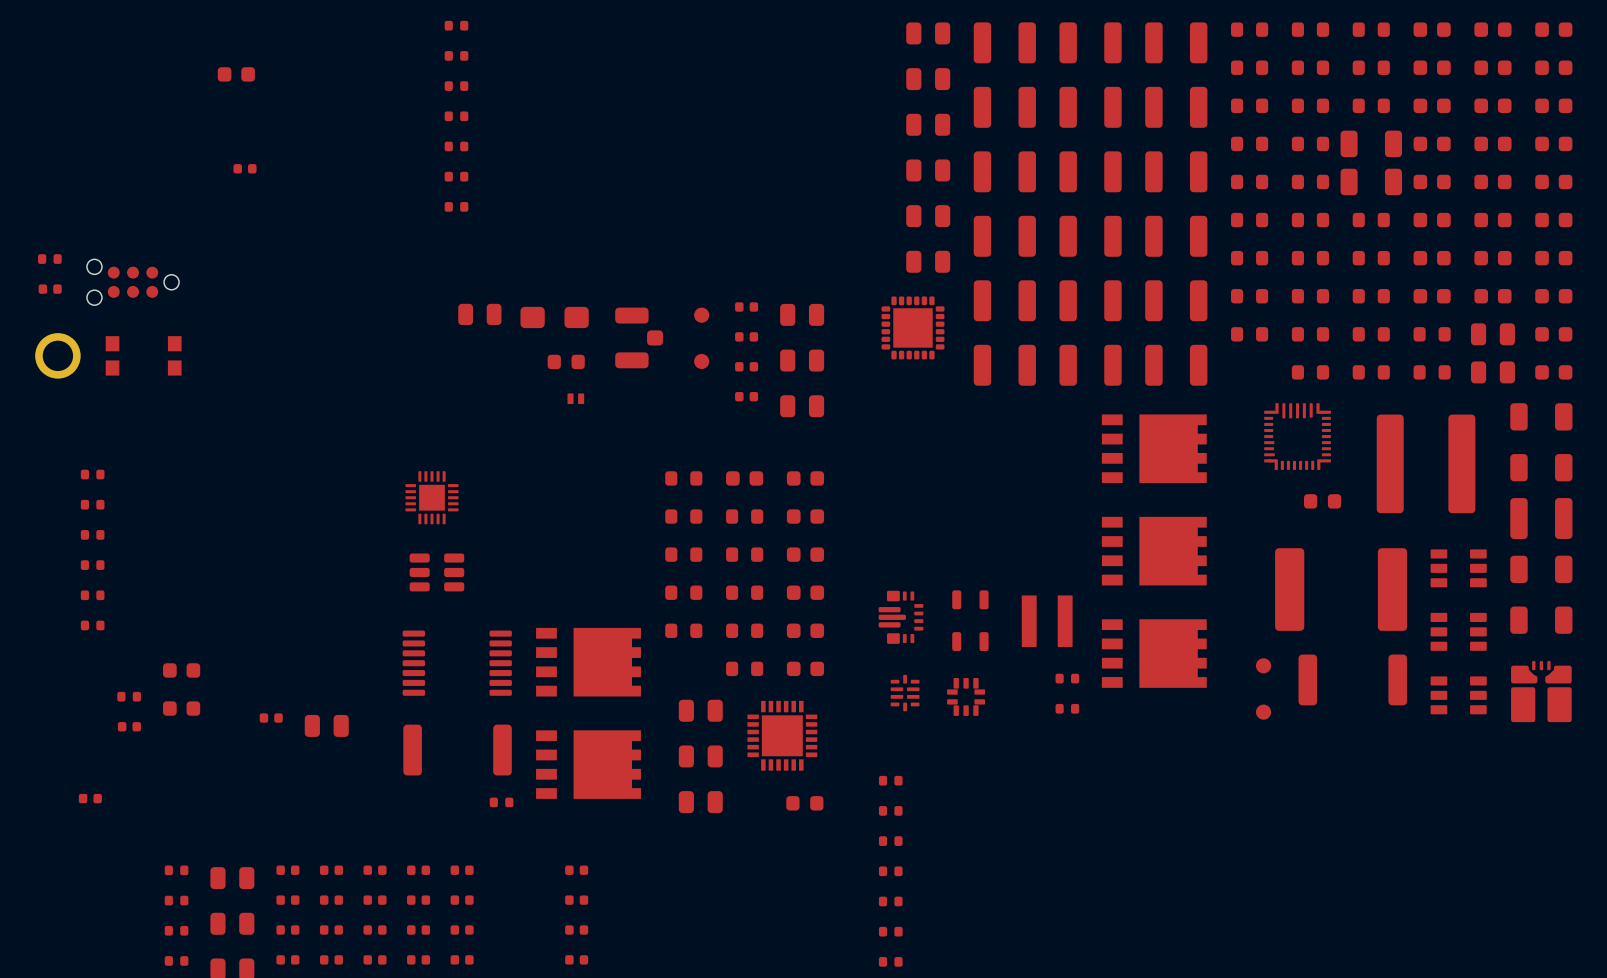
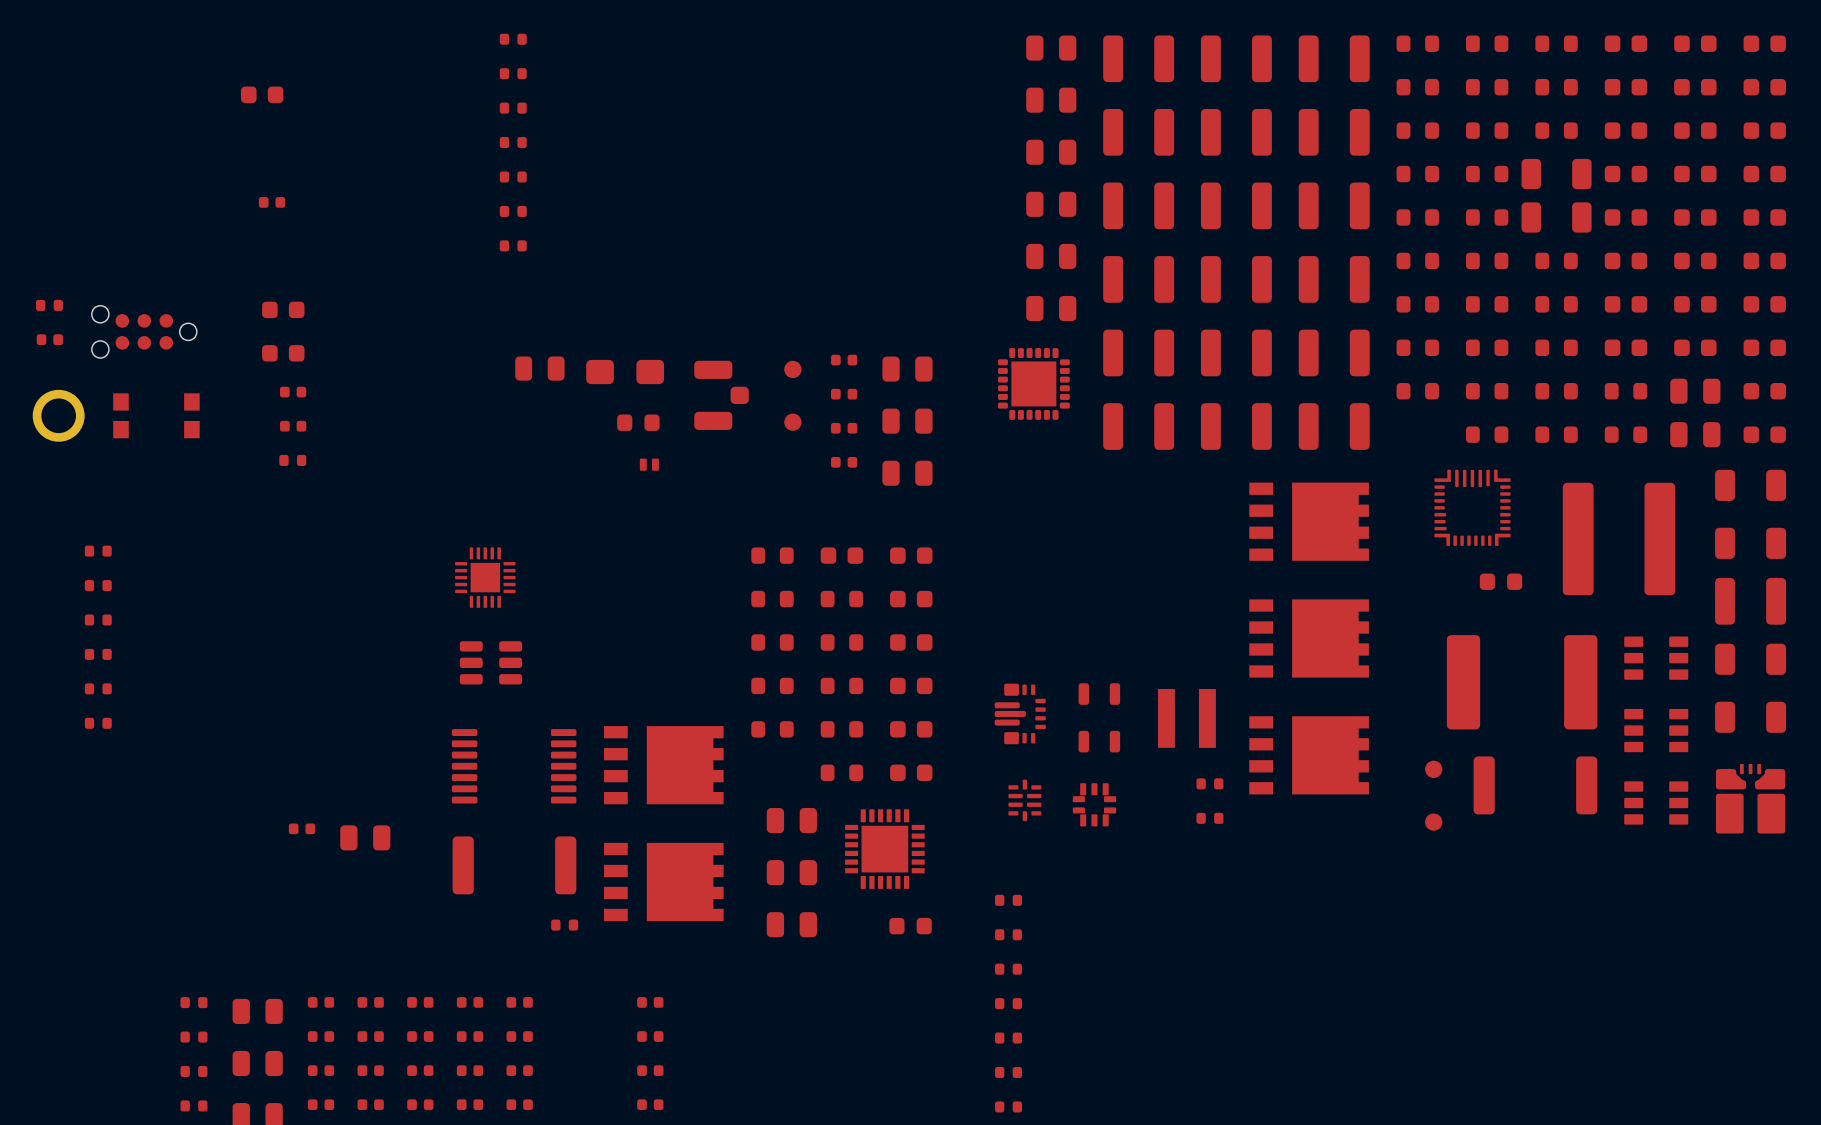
part: none -> (283, 309)
part: none -> (283, 353)
part: none -> (293, 392)
part: none -> (293, 426)
part: (181, 670) -> none
part position: (129, 696) -> (292, 460)
part: (181, 708) -> none
part: (129, 726) -> none
part: (90, 798) -> none

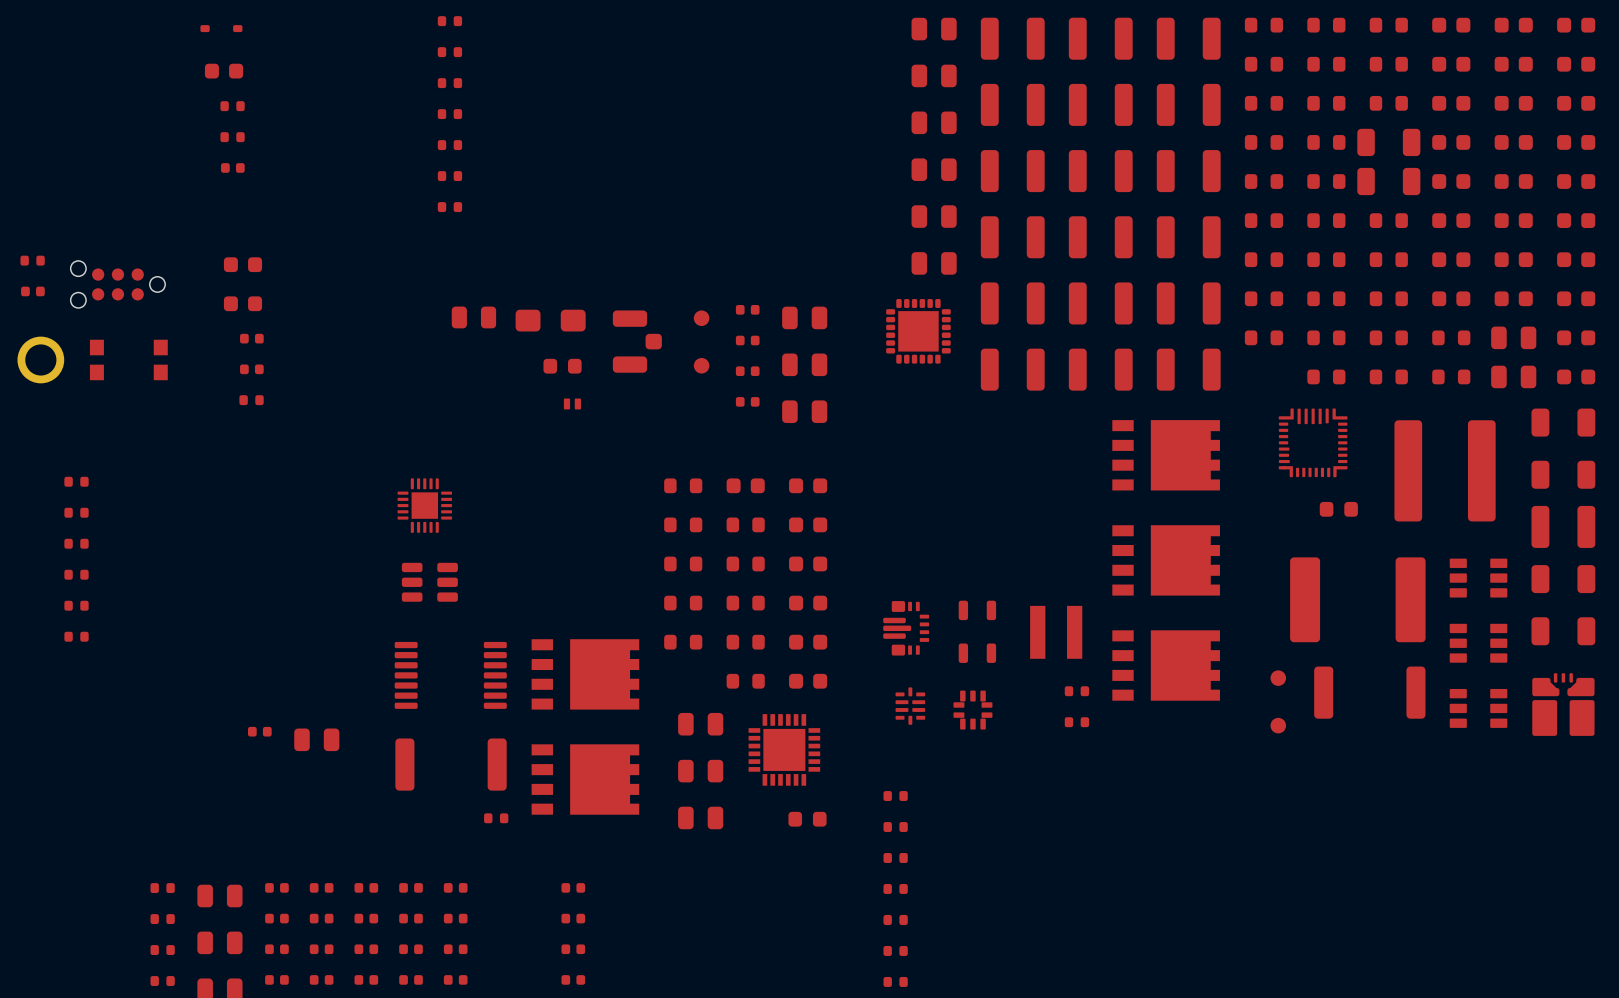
part: none -> (221, 28)
part: none -> (232, 106)
part: none -> (232, 137)

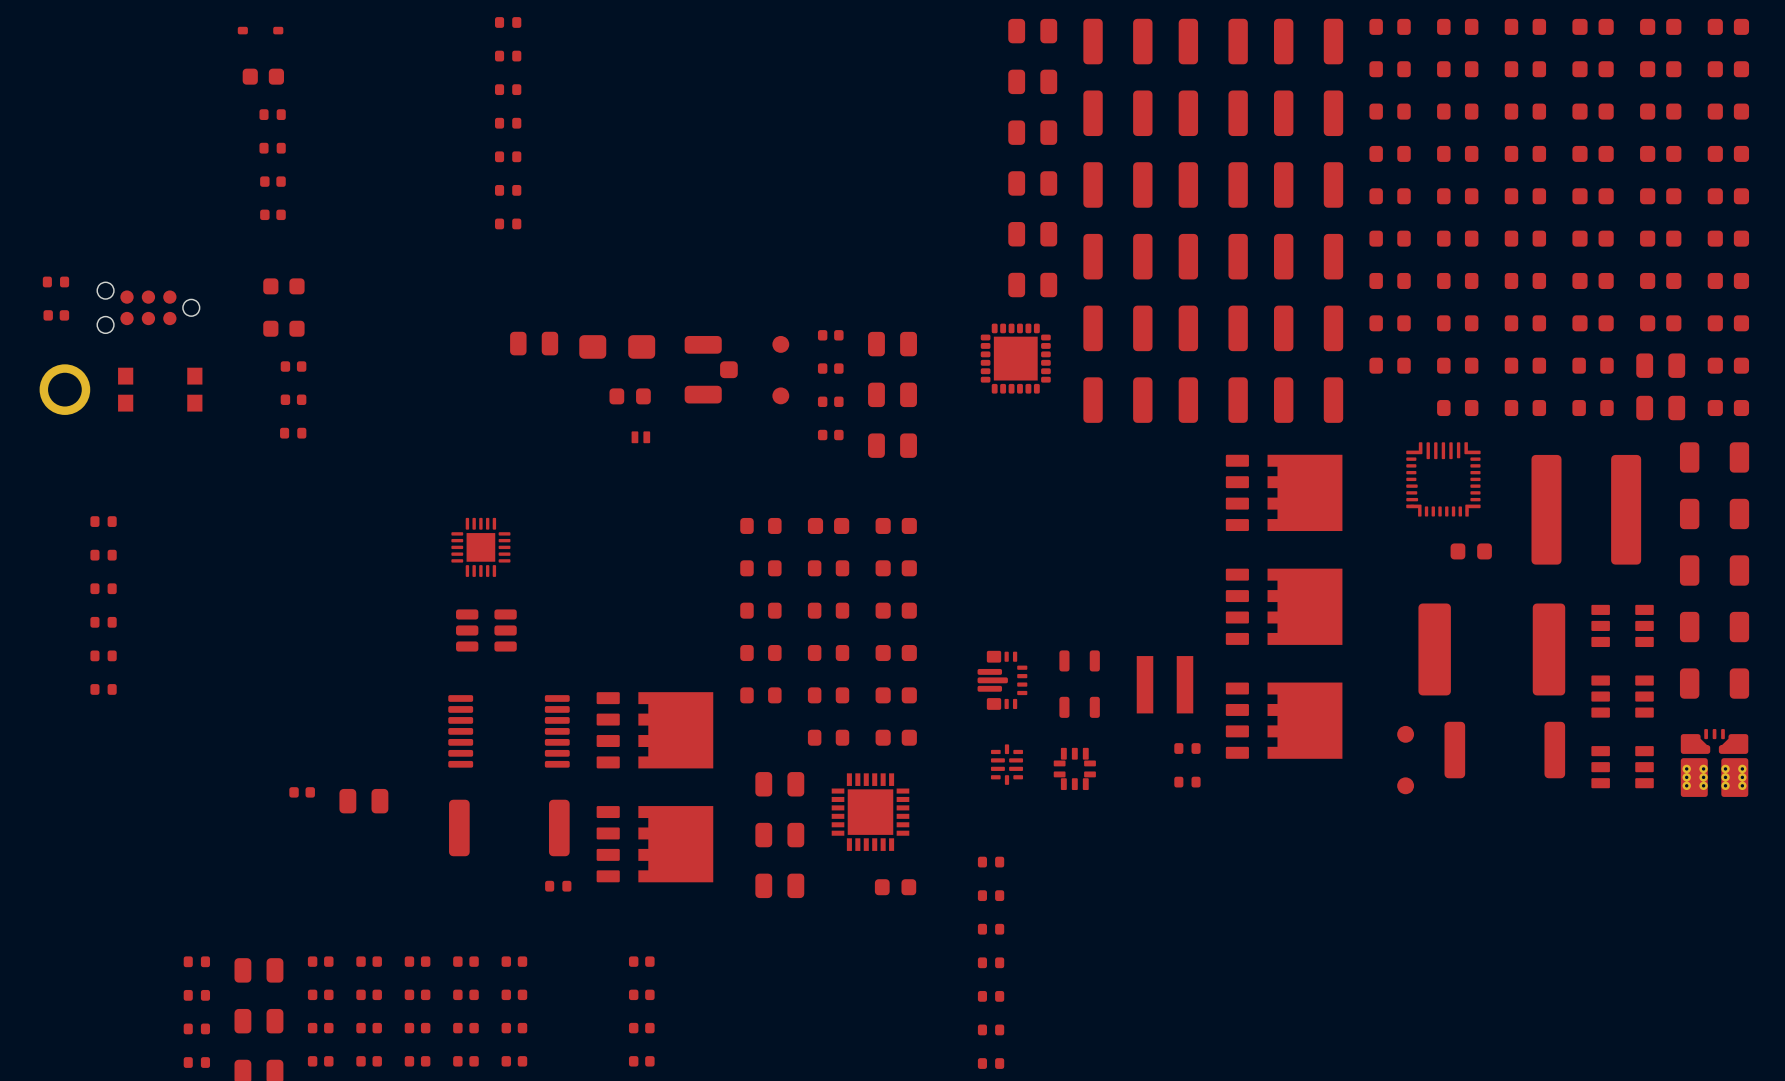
part footprint: [1357, 128, 1421, 157] -> [1504, 145, 1547, 162]
part footprint: [1357, 167, 1421, 196] -> [1504, 188, 1547, 205]
part: none -> (272, 214)
part footprint: [1112, 420, 1220, 491] -> [1225, 454, 1343, 532]
part footprint: [1531, 505, 1596, 548] -> [1679, 555, 1750, 586]
part footprint: [1112, 525, 1220, 596] -> [1225, 568, 1343, 645]
part footprint: [1112, 630, 1220, 701] -> [1225, 682, 1343, 759]
part footprint: [531, 639, 640, 710] -> [596, 692, 714, 769]
part footprint: [1532, 673, 1595, 736] -> [1680, 729, 1749, 797]
part footprint: [531, 744, 640, 815] -> [596, 806, 714, 883]

